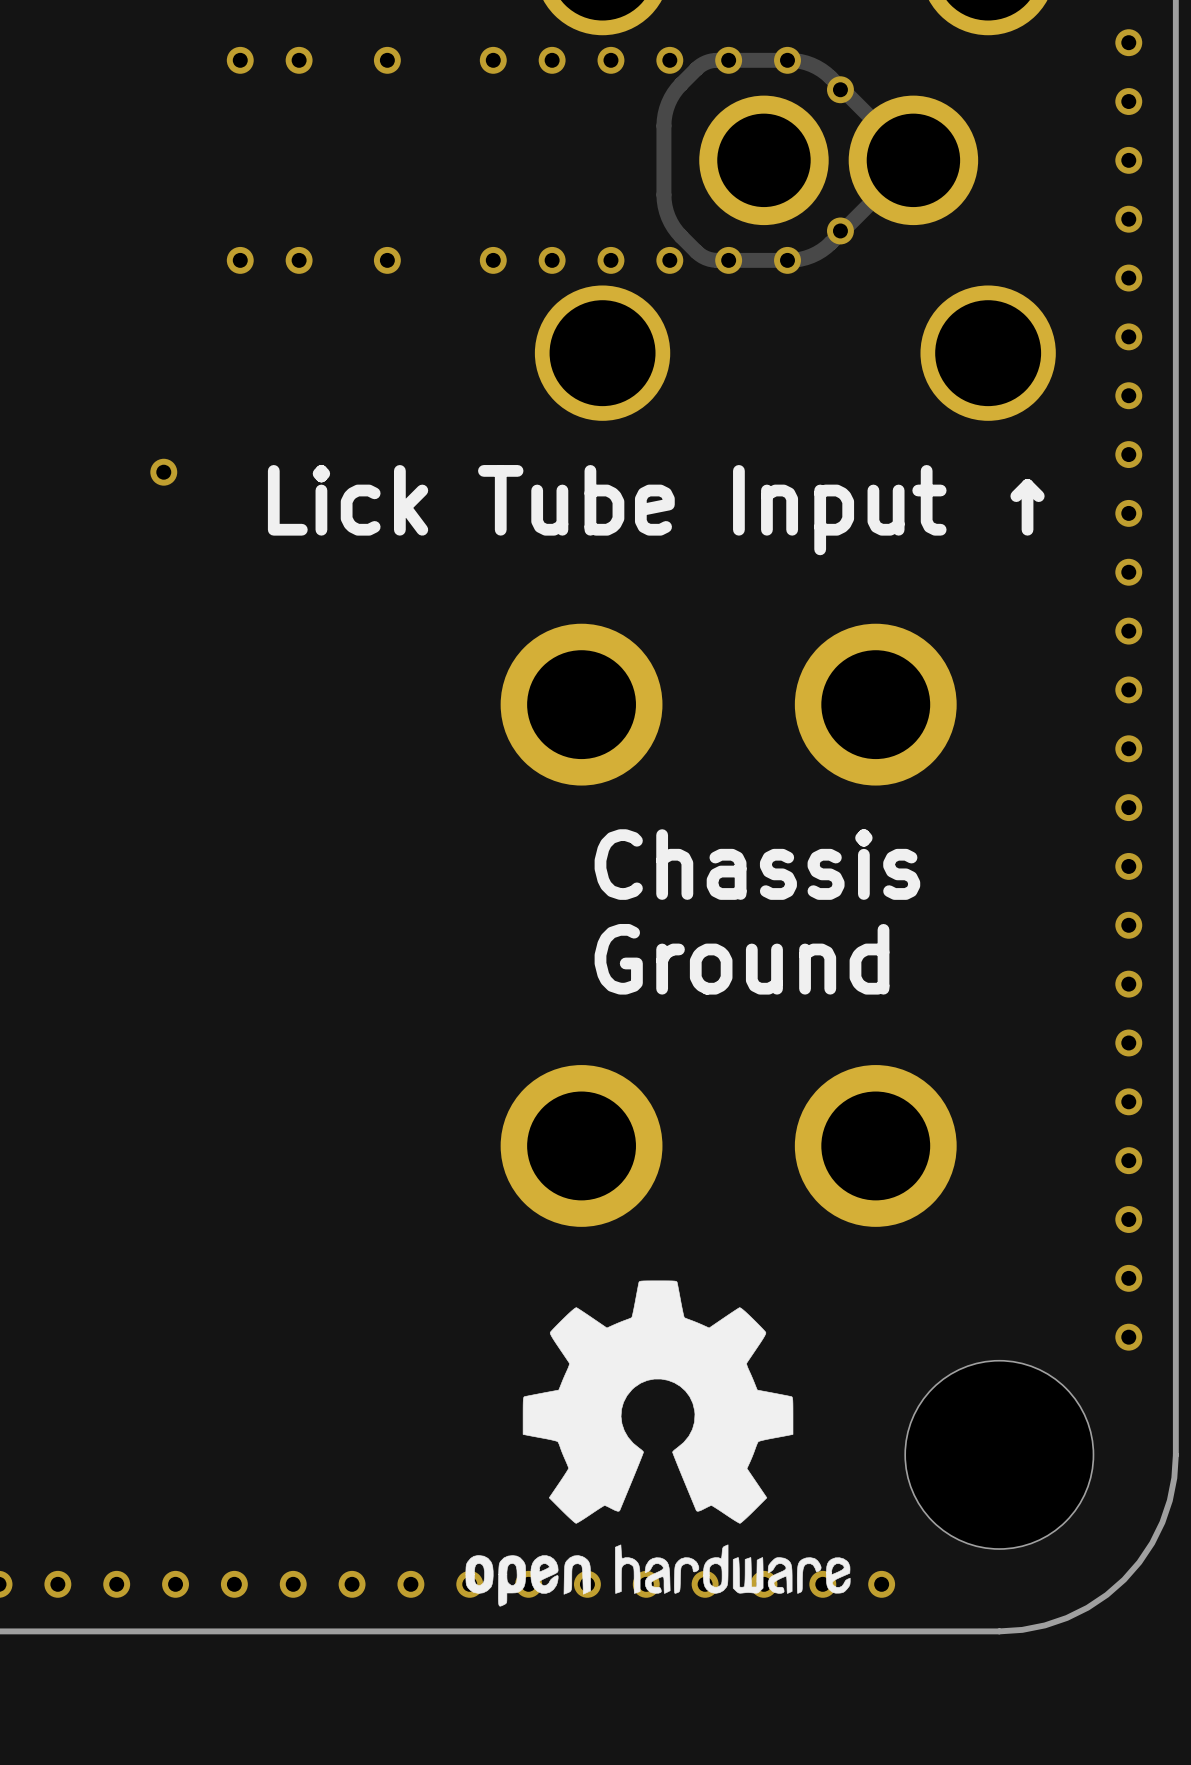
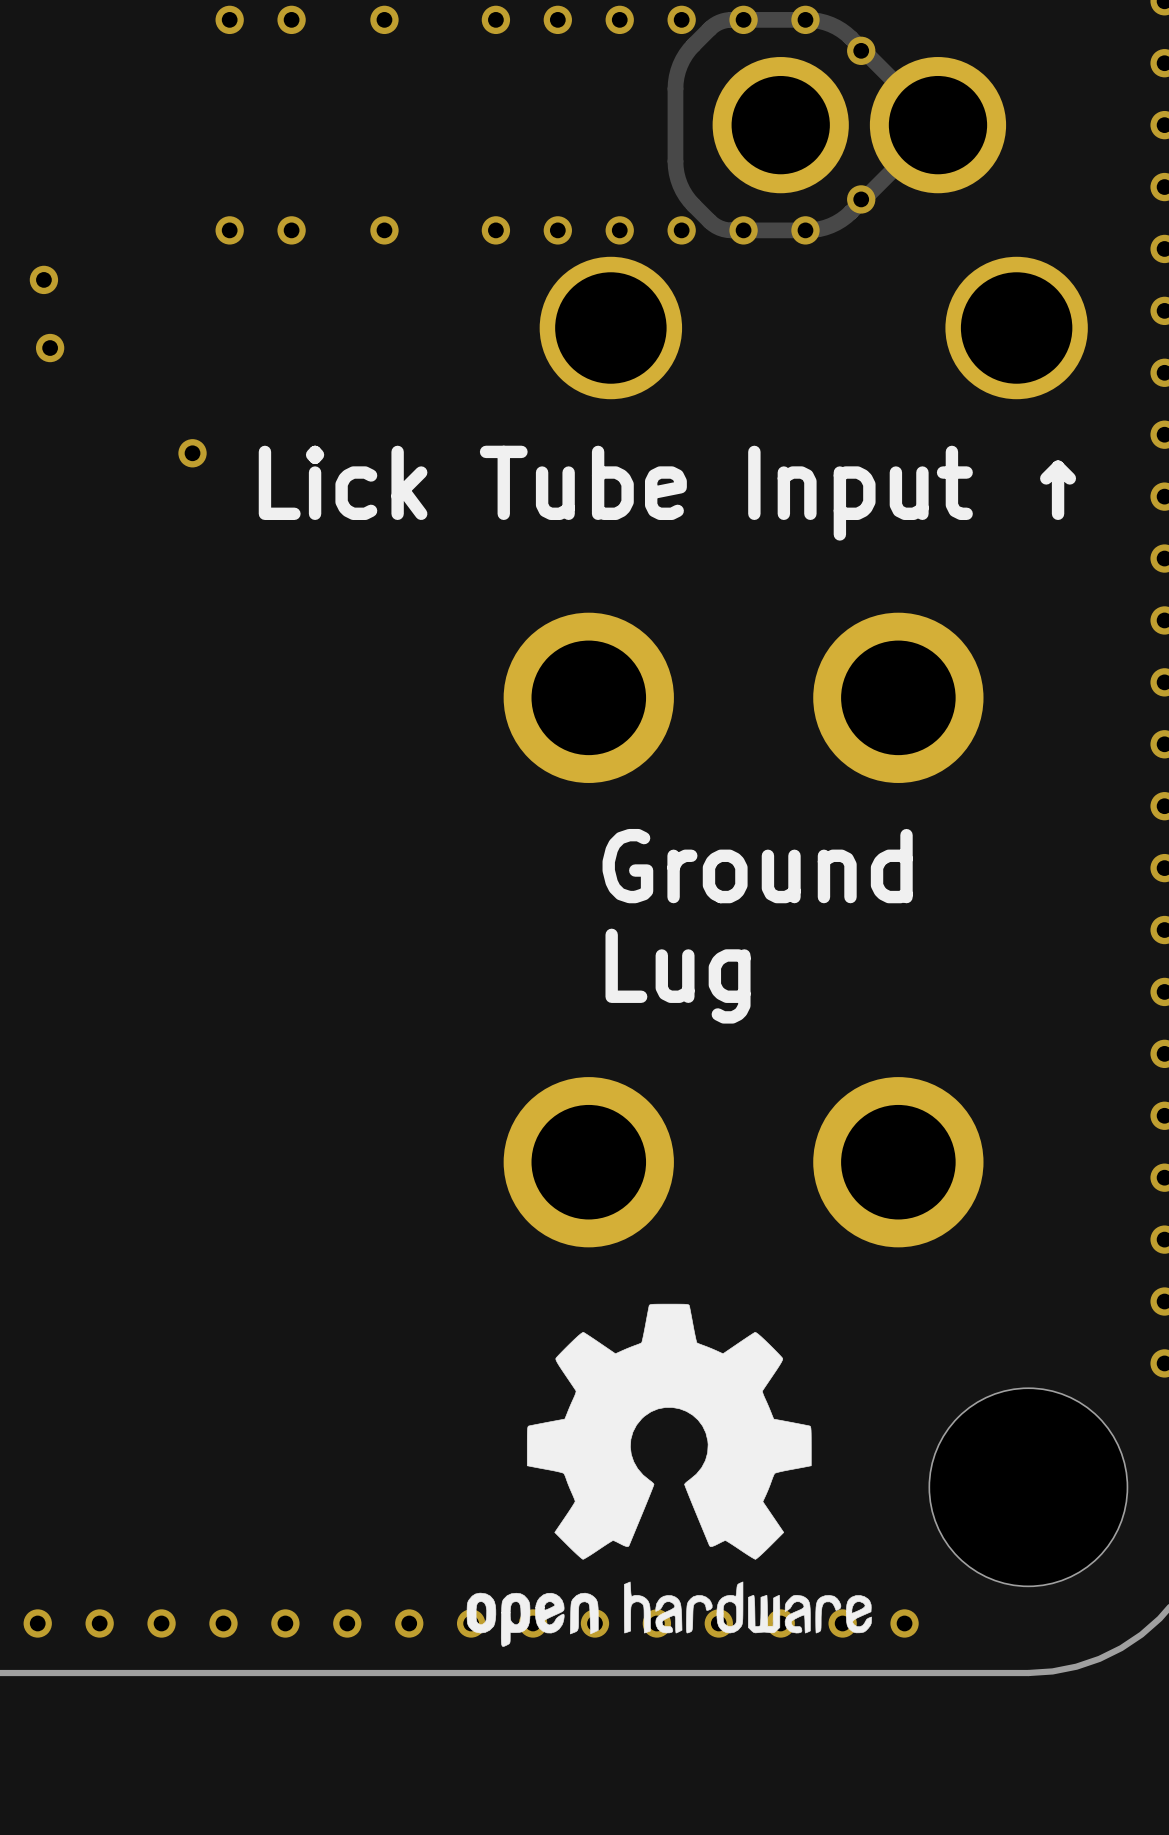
via: none -> (43, 279)
via: none -> (50, 348)
via position: (163, 472) -> (192, 453)
text: Chassis (757, 864) -> Ground (757, 866)
text: Ground (742, 959) -> Lug (678, 976)

